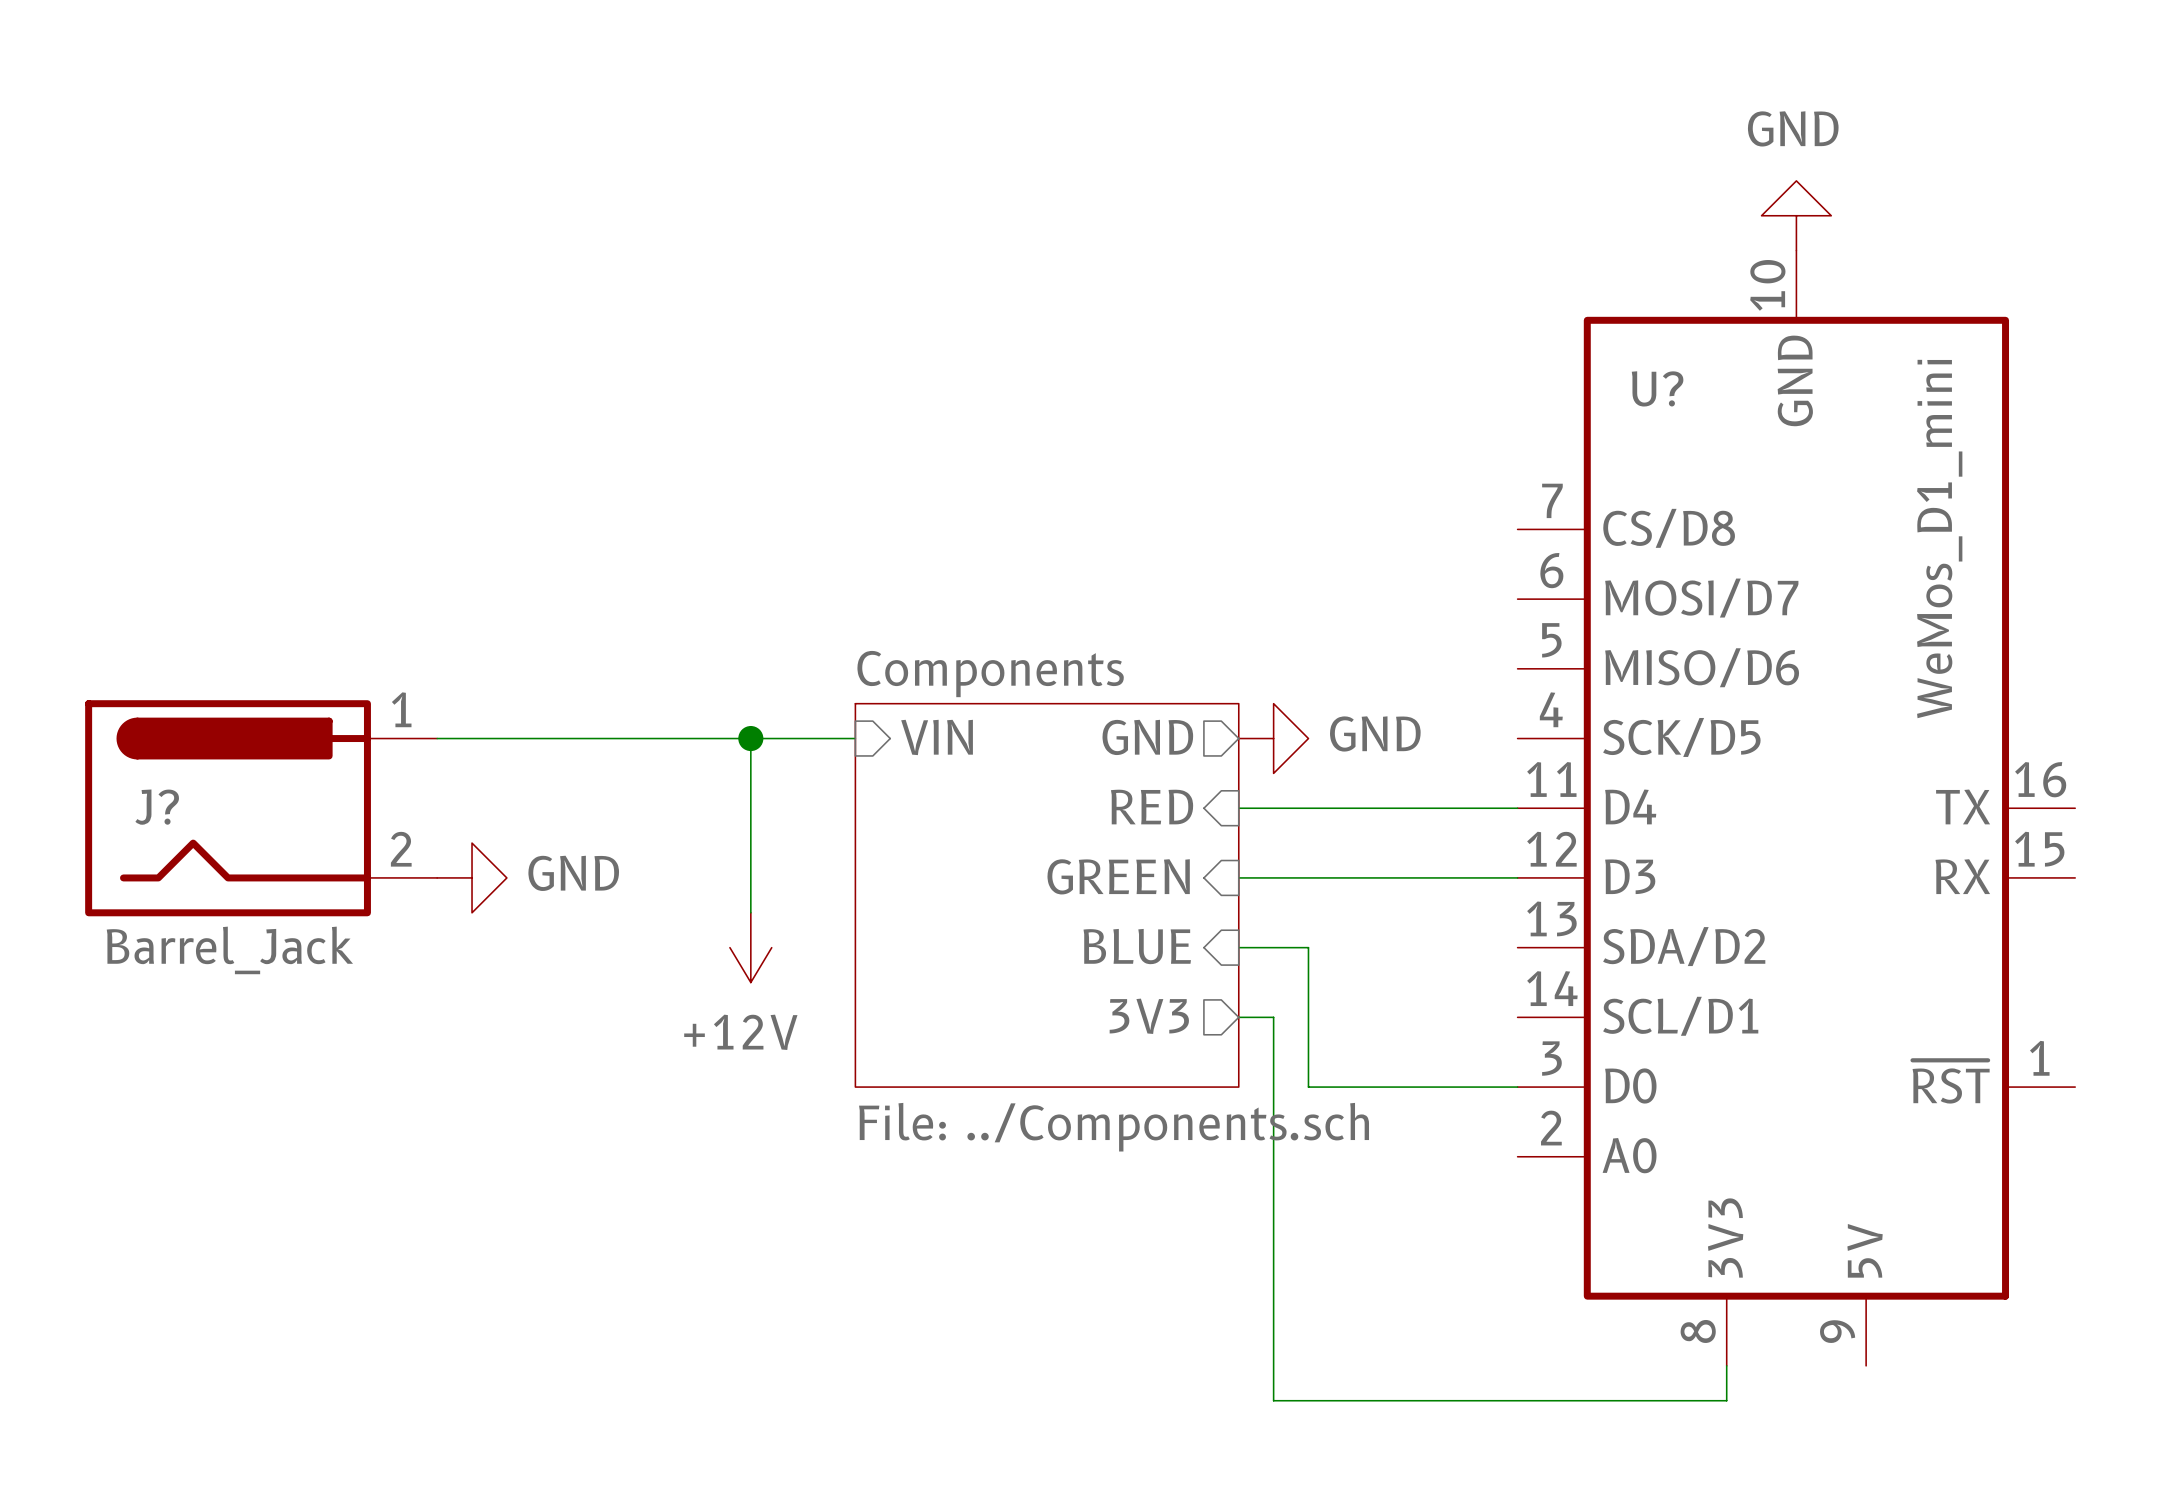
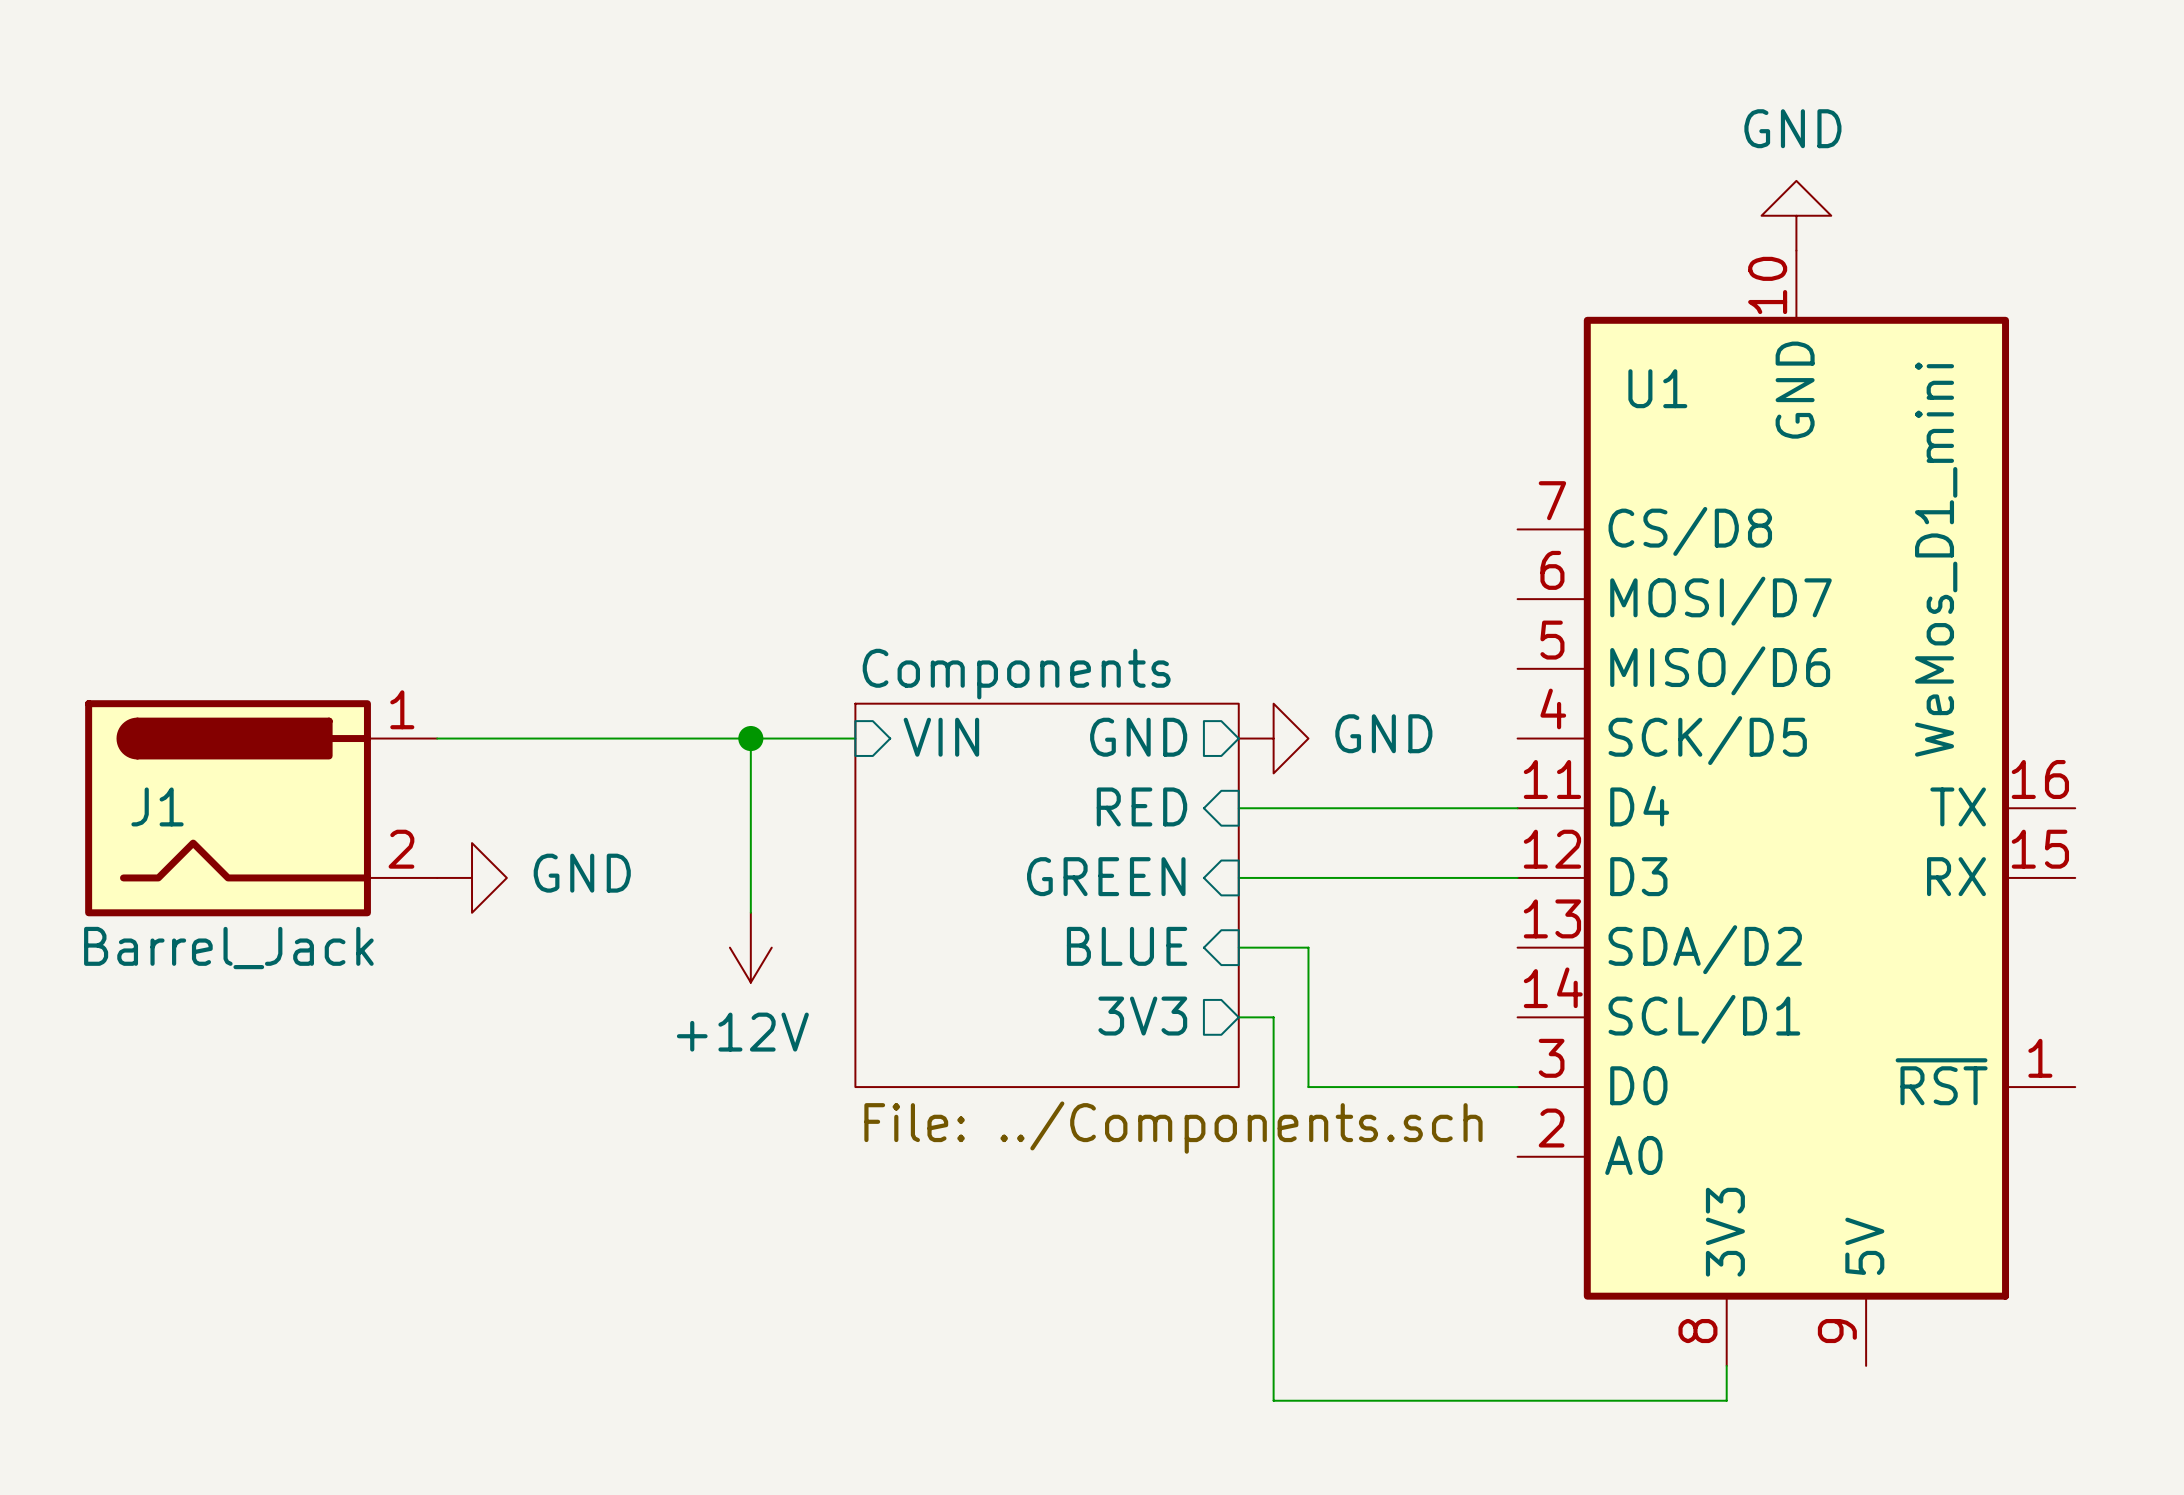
U? name: U? (1657, 388) -> U1 (1657, 388)
J? name: J? (157, 807) -> J1 (157, 806)

